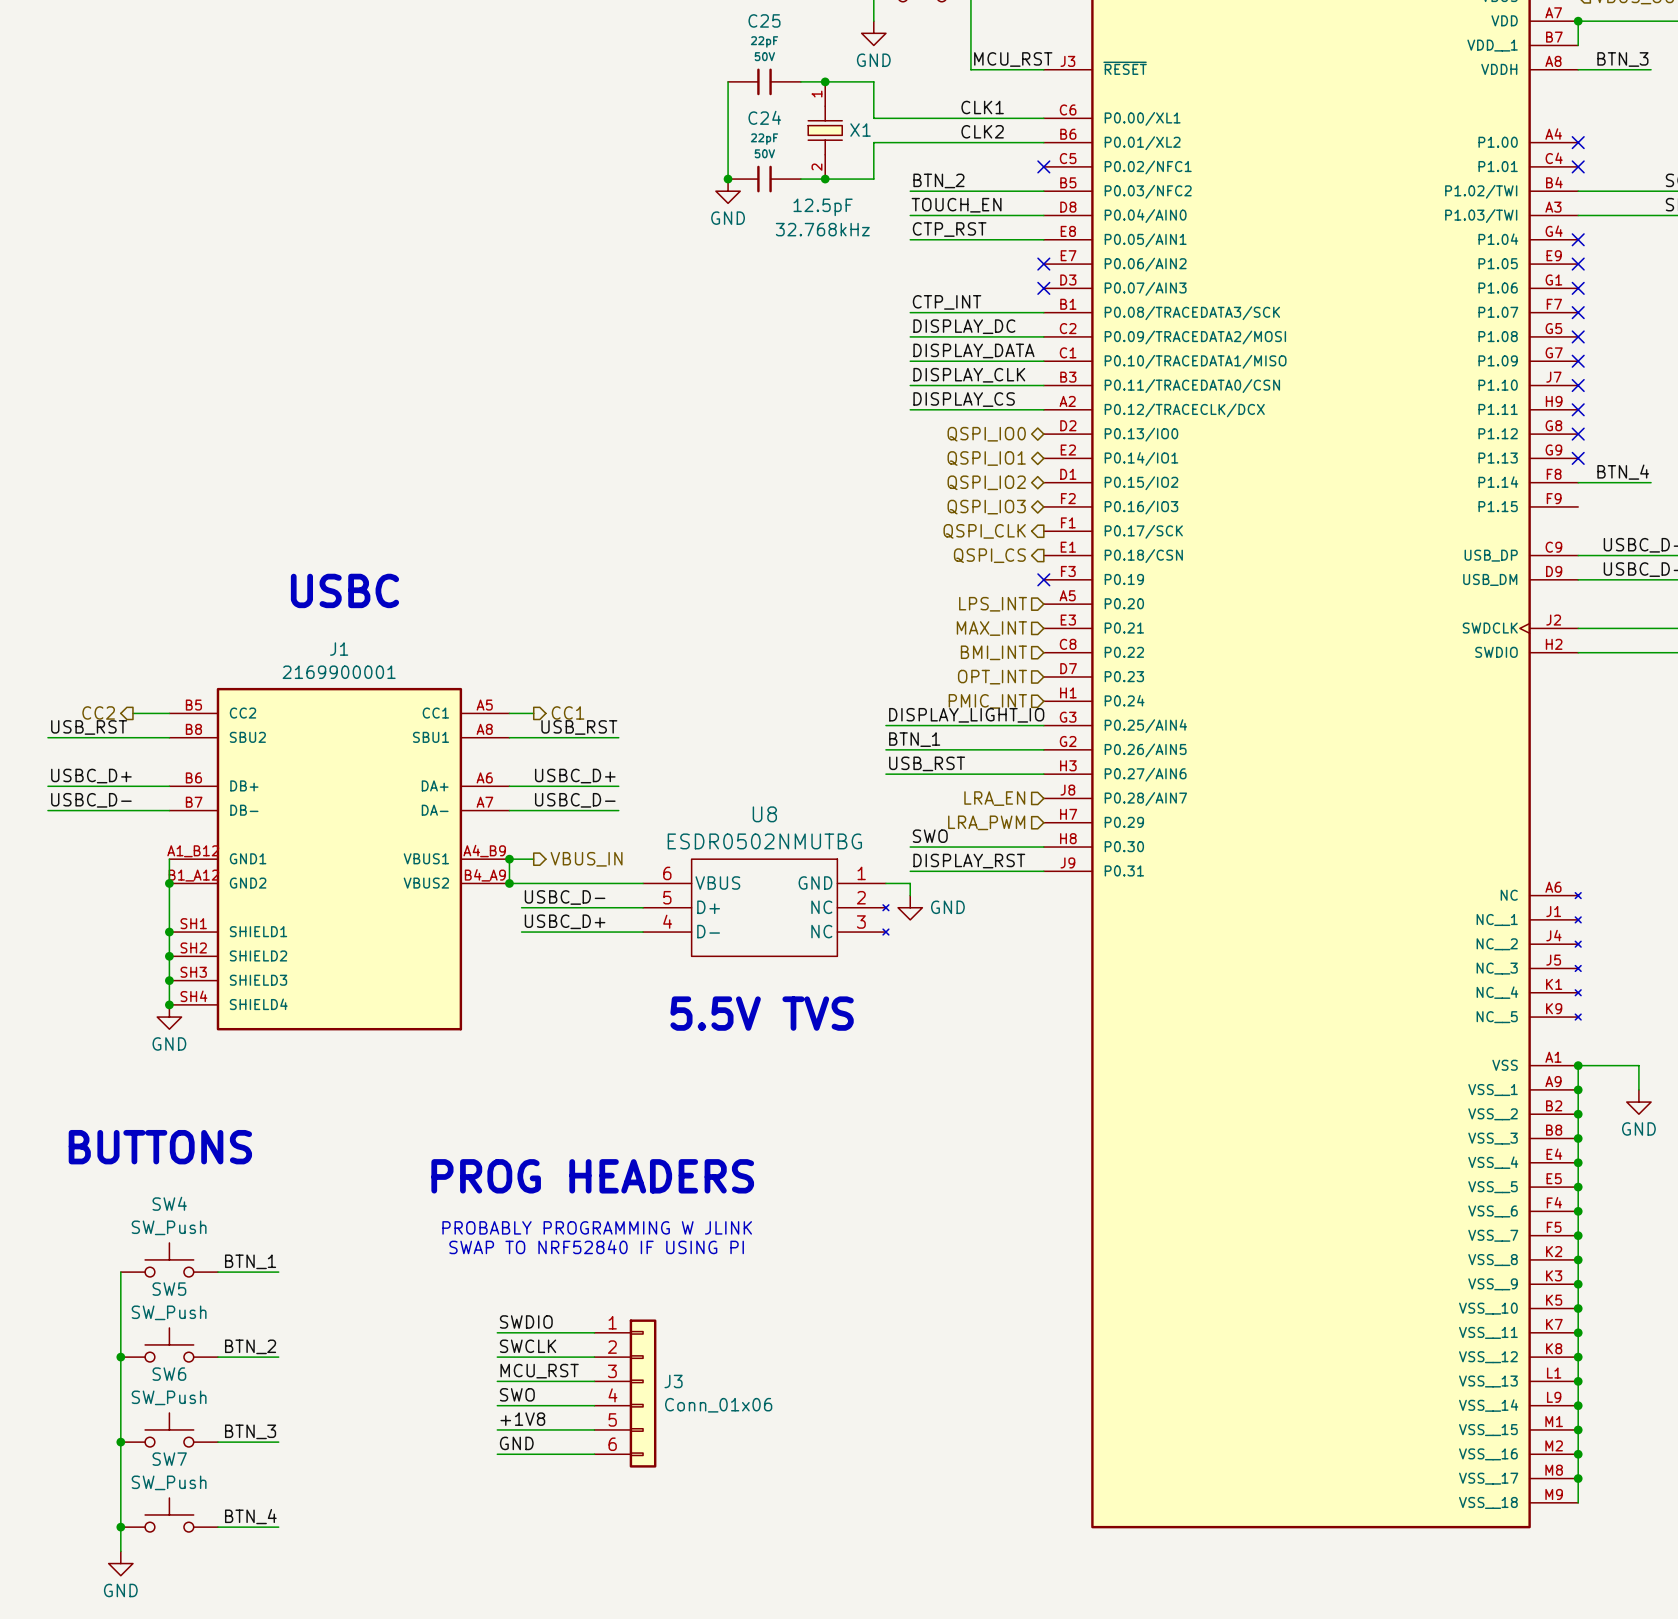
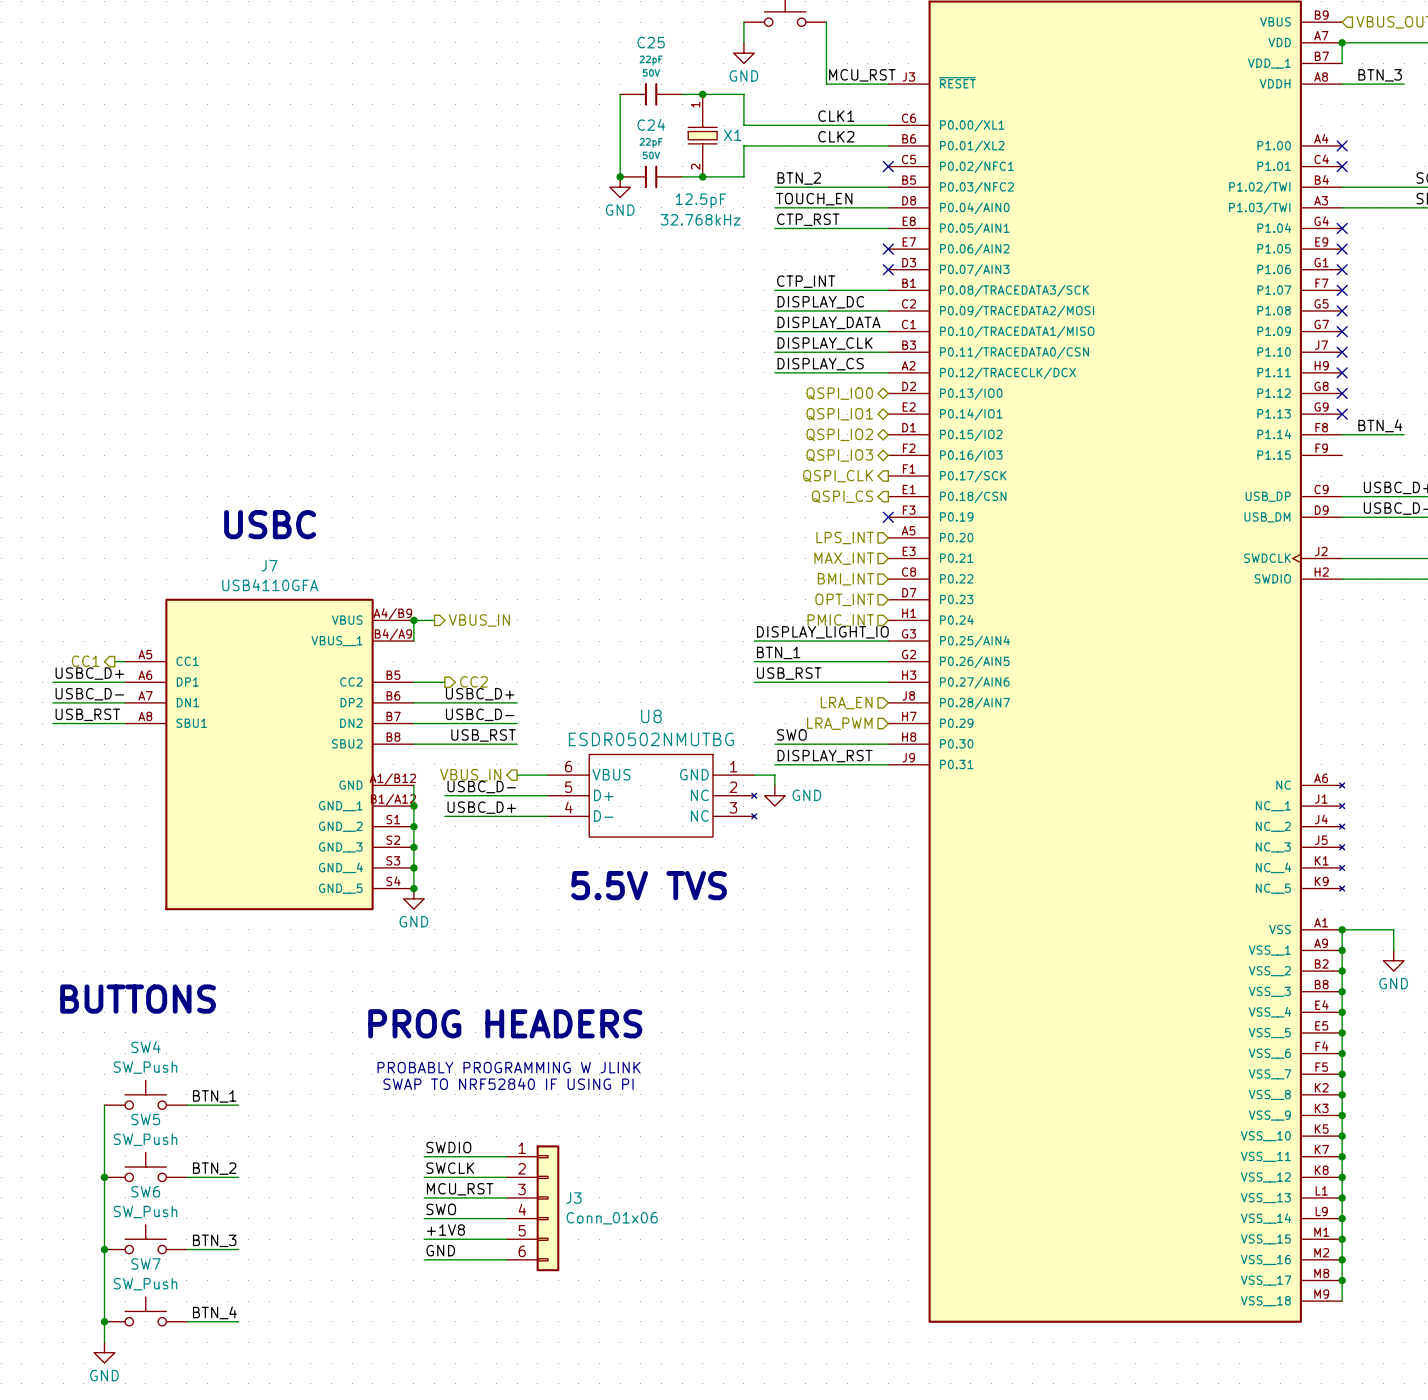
text position: USBC (344, 590) -> USBC (270, 524)
junction: none -> (413, 620)
wire: none -> (434, 620) (413, 620) (413, 641)
hierarchical label: none -> VBUS_IN (479, 620)
hierarchical label: CC2 (98, 712) -> none
hierarchical label: CC1 (568, 712) -> none
wire: (132, 713) (169, 713) -> none
wire: (509, 713) (533, 713) -> none
label position: USB_RST (89, 727) -> USB_RST (87, 714)
label position: USB_RST (579, 727) -> USB_RST (483, 735)
wire: (47, 737) (169, 737) -> none
wire: (509, 737) (618, 737) -> none
hierarchical label: none -> CC1 (85, 661)
wire: none -> (114, 661) (125, 661)
hierarchical label: none -> CC2 (473, 681)
wire: none -> (52, 682) (125, 682)
wire: none -> (413, 682) (444, 682)
label position: USBC_D+ (91, 776) -> USBC_D+ (89, 673)
label position: USBC_D+ (575, 776) -> USBC_D+ (480, 694)
wire: (47, 786) (169, 786) -> none
wire: (509, 786) (618, 786) -> none
wire: none -> (52, 702) (125, 702)
wire: none -> (413, 702) (517, 702)
label position: USBC_D- (91, 800) -> USBC_D- (89, 694)
label position: USBC_D- (575, 800) -> USBC_D- (480, 714)
wire: (47, 810) (169, 810) -> none
wire: (509, 810) (618, 810) -> none
wire: none -> (52, 723) (125, 723)
wire: none -> (413, 723) (517, 723)
wire: none -> (413, 744) (517, 744)
wire: (169, 859) (169, 1004) -> none
J7: none -> USB4110GFA (269, 754)
J1: 2169900001 (339, 859) -> none
junction: (509, 859) -> none
wire: (533, 859) (509, 859) (509, 883) (606, 883) -> none
hierarchical label rotation: 0° (586, 859) -> 180° (470, 775)
junction: (169, 883) -> none
junction: (509, 883) -> none
wire: none -> (413, 785) (413, 888)
junction: none -> (413, 806)
junction: (169, 932) -> none
junction: none -> (413, 826)
junction: (169, 956) -> none
junction: none -> (413, 847)
junction: (169, 980) -> none
junction: none -> (413, 867)
junction: (169, 1004) -> none
power symbol: GND (169, 1017) -> none
junction: none -> (413, 888)
power symbol: none -> GND (413, 898)

